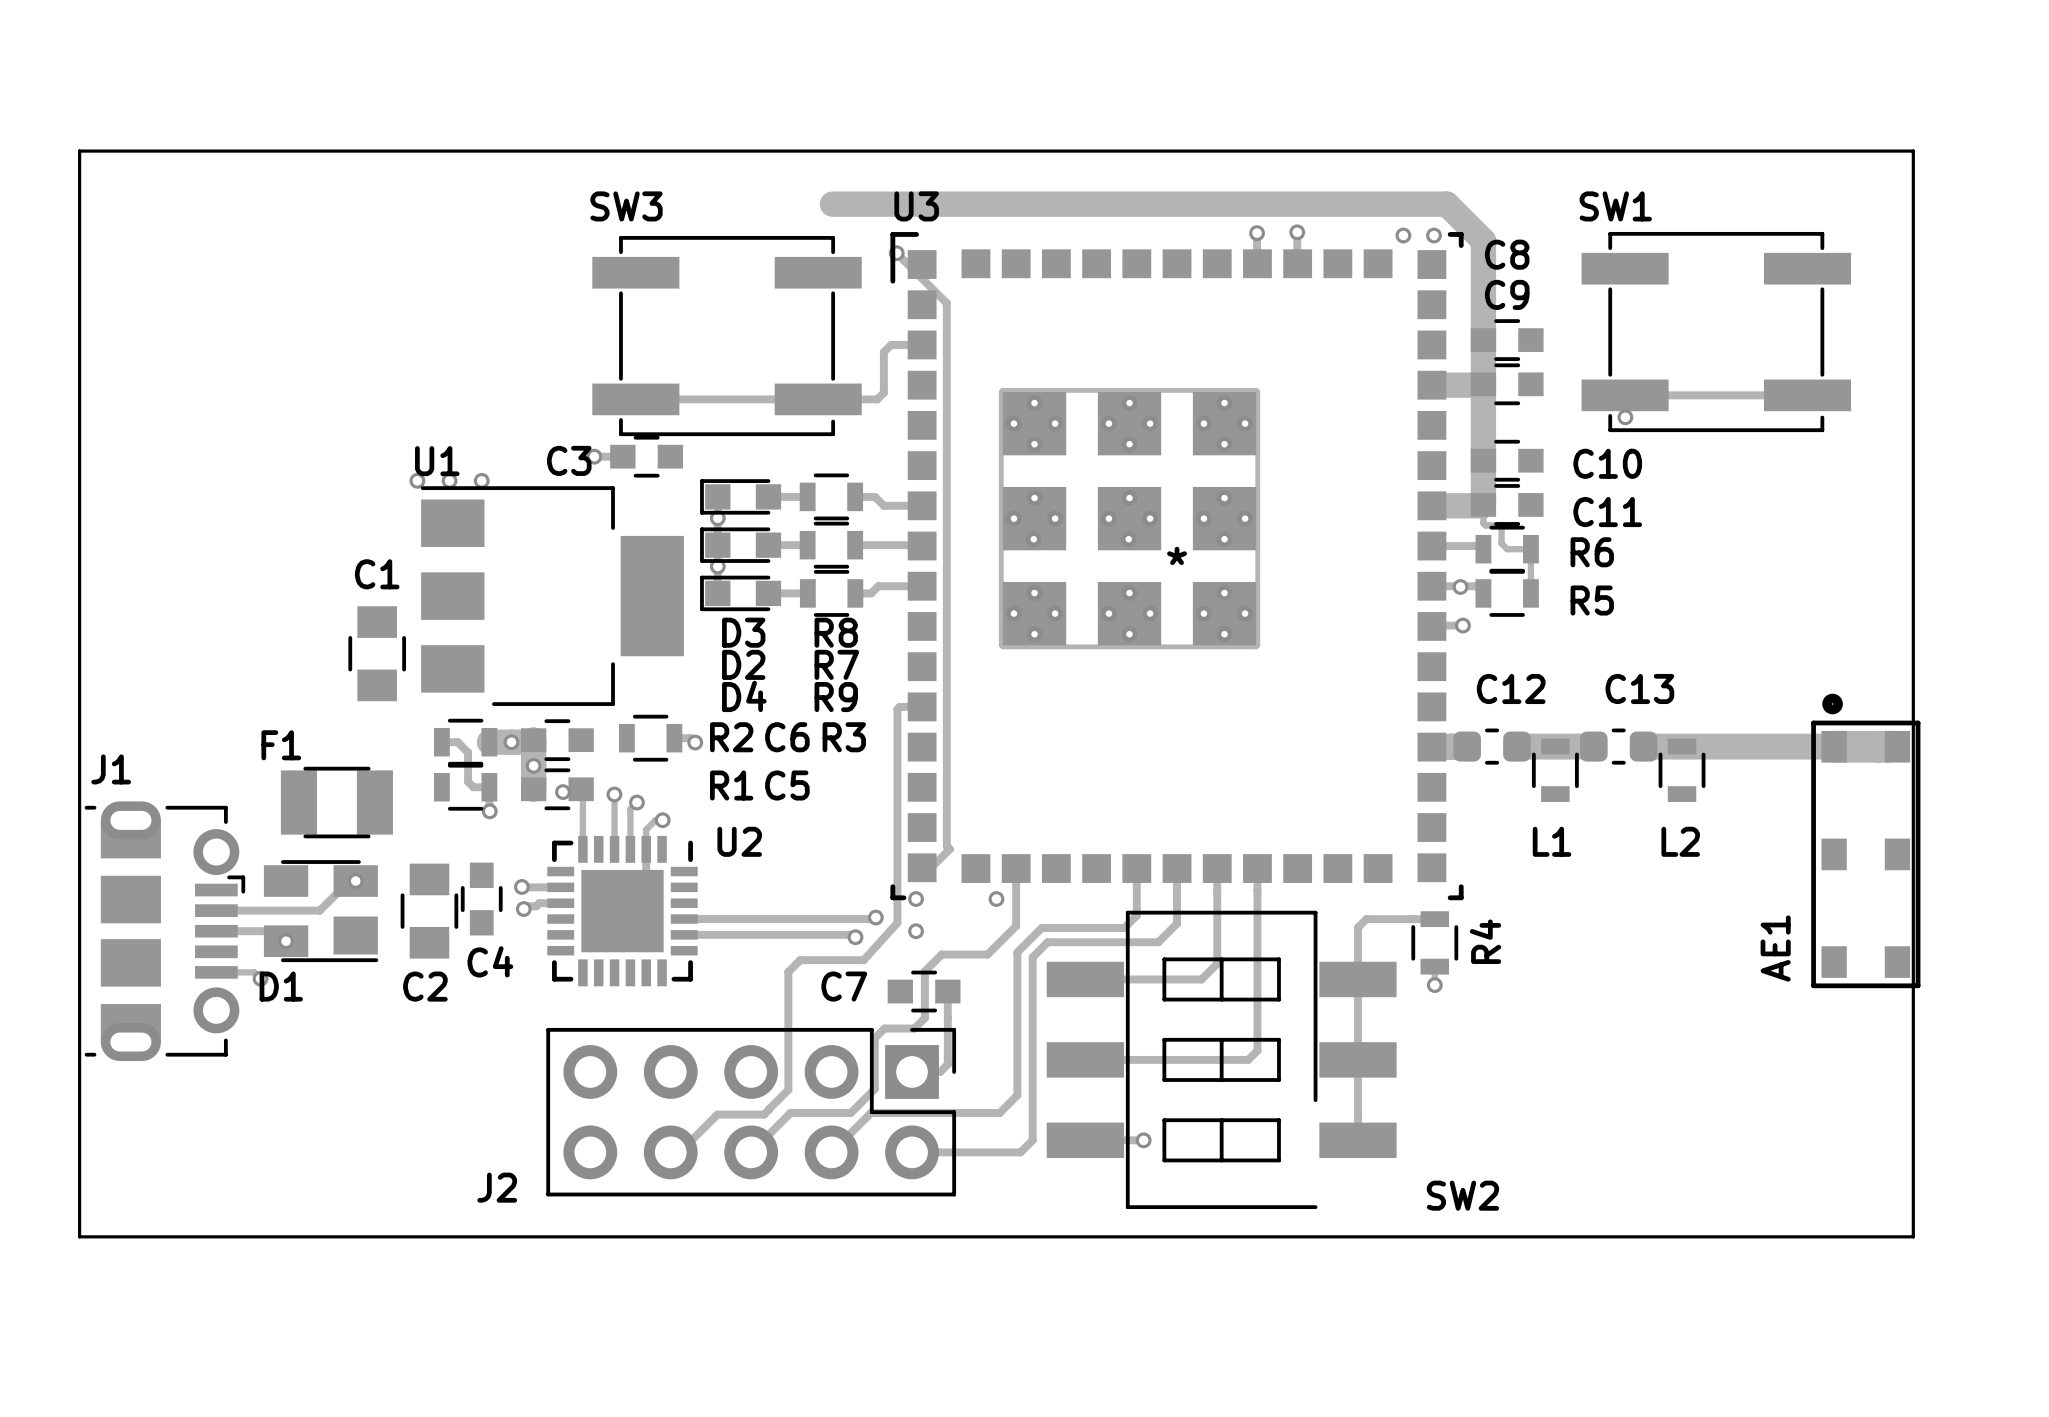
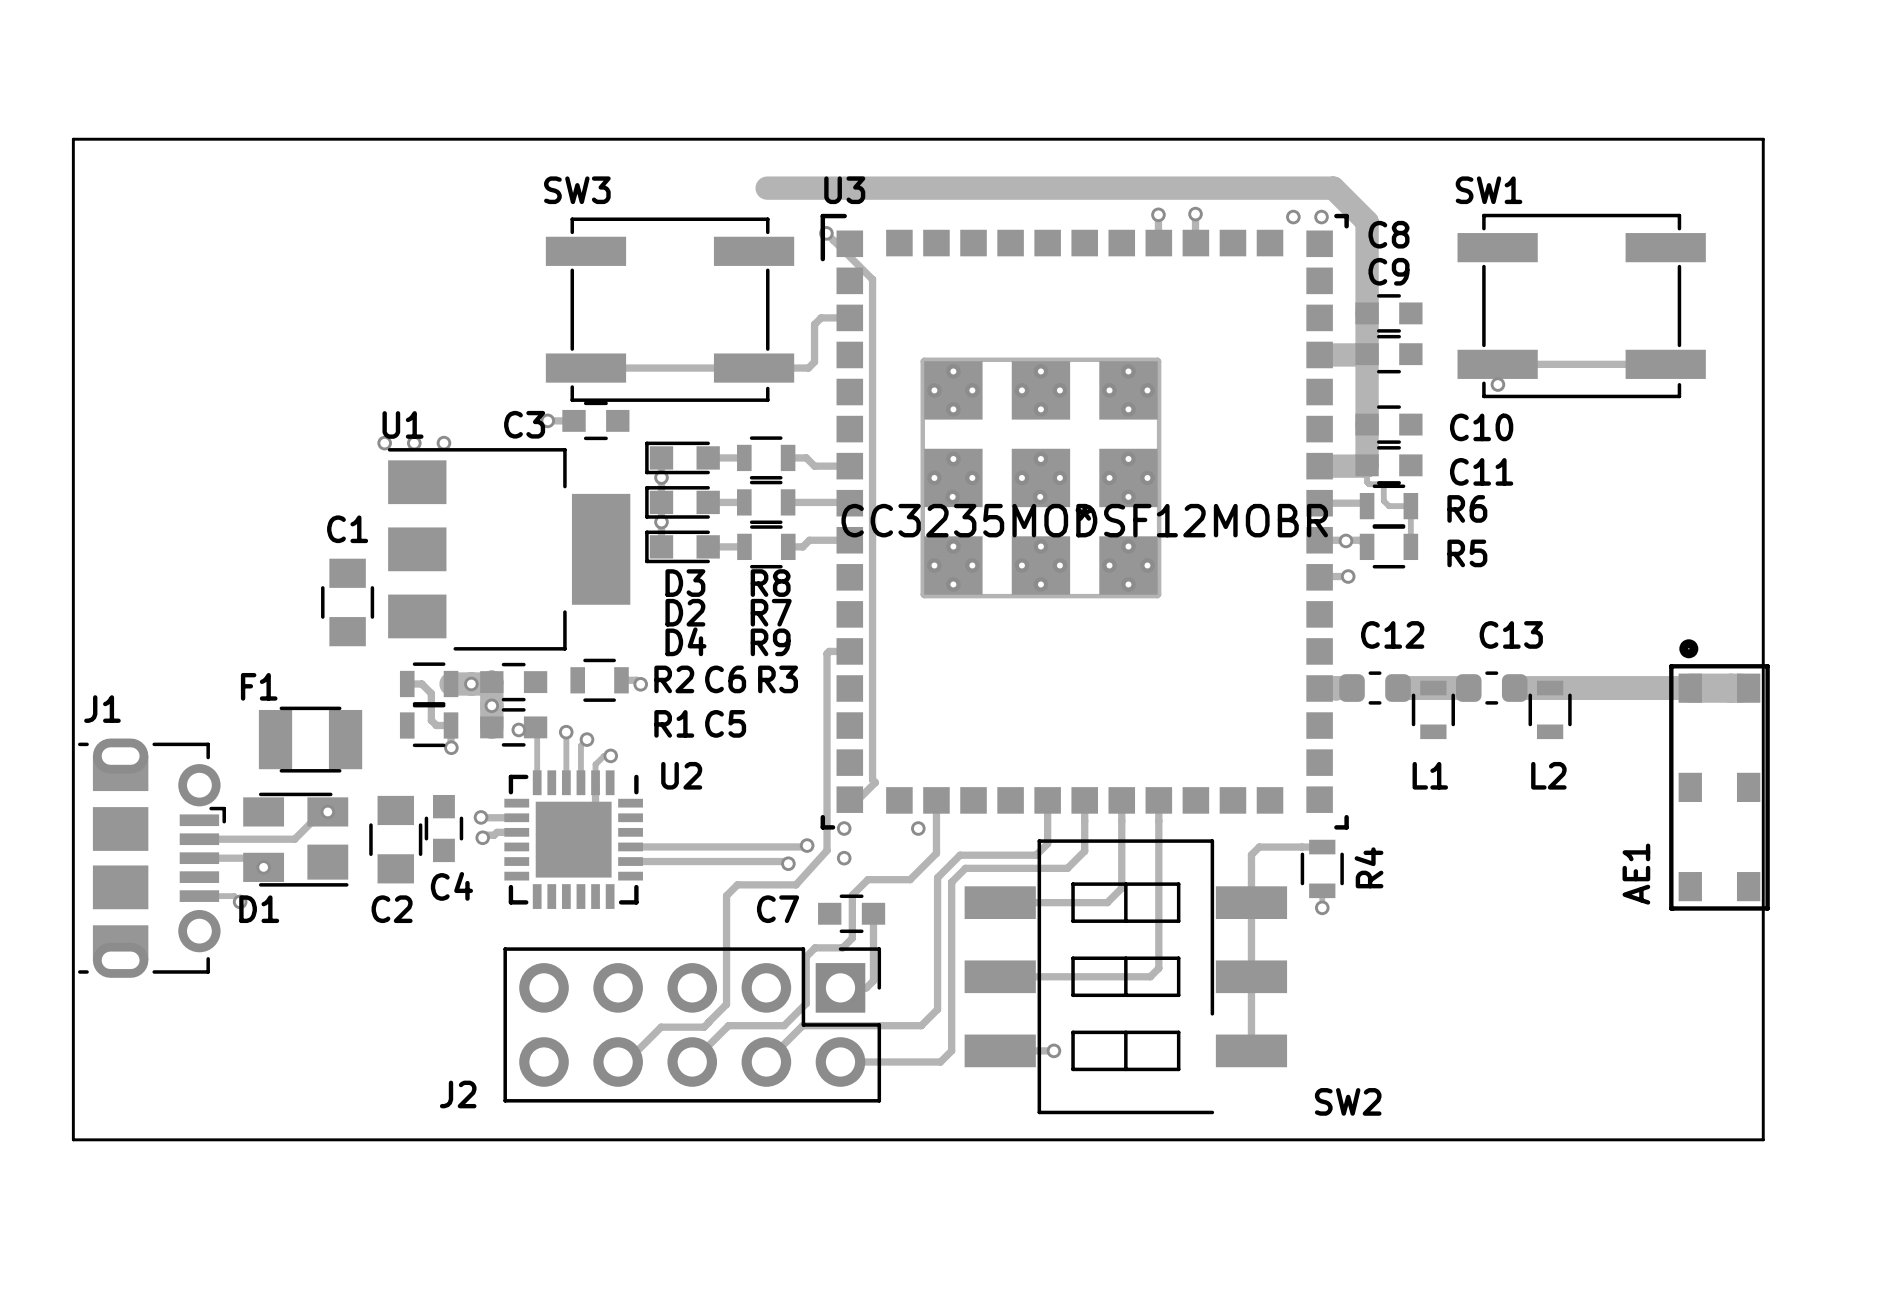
U3 value: none -> CC3235MODSF12MOBR (1084, 520)

